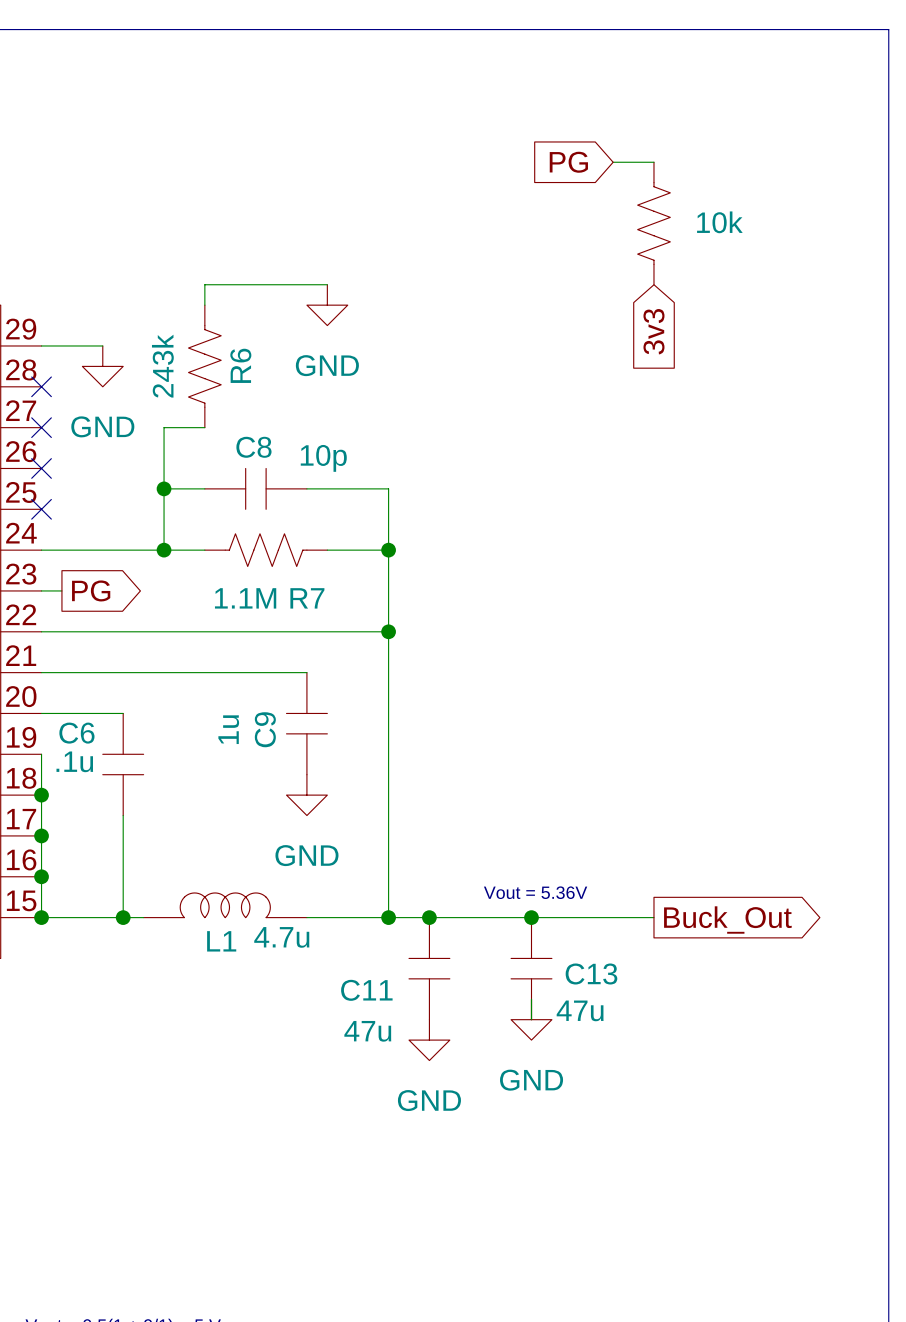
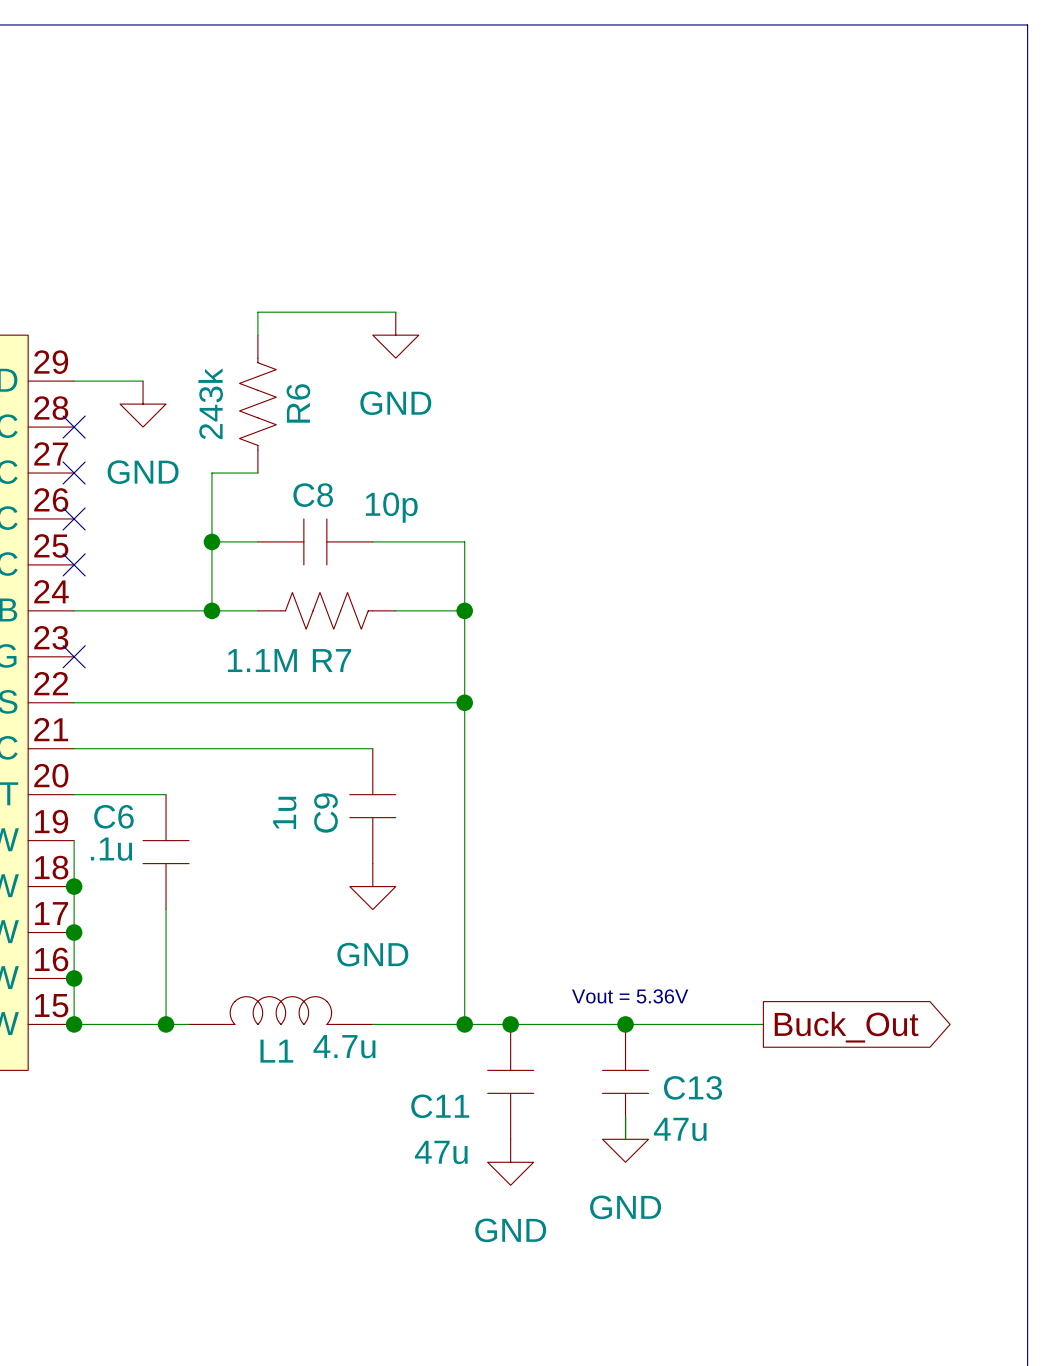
global label: PG (568, 162) -> none
wire: (613, 162) (653, 162) -> none
part: 10k (653, 223) -> none
global label: 3v3 (653, 331) -> none
wire: (41, 590) (61, 590) -> none
no-connect mark: none -> (74, 656)
global label: PG (91, 590) -> none
R7 value position: 1.1M (245, 598) -> 1.1M (262, 660)
R7 name position: R7 (307, 598) -> R7 (331, 660)

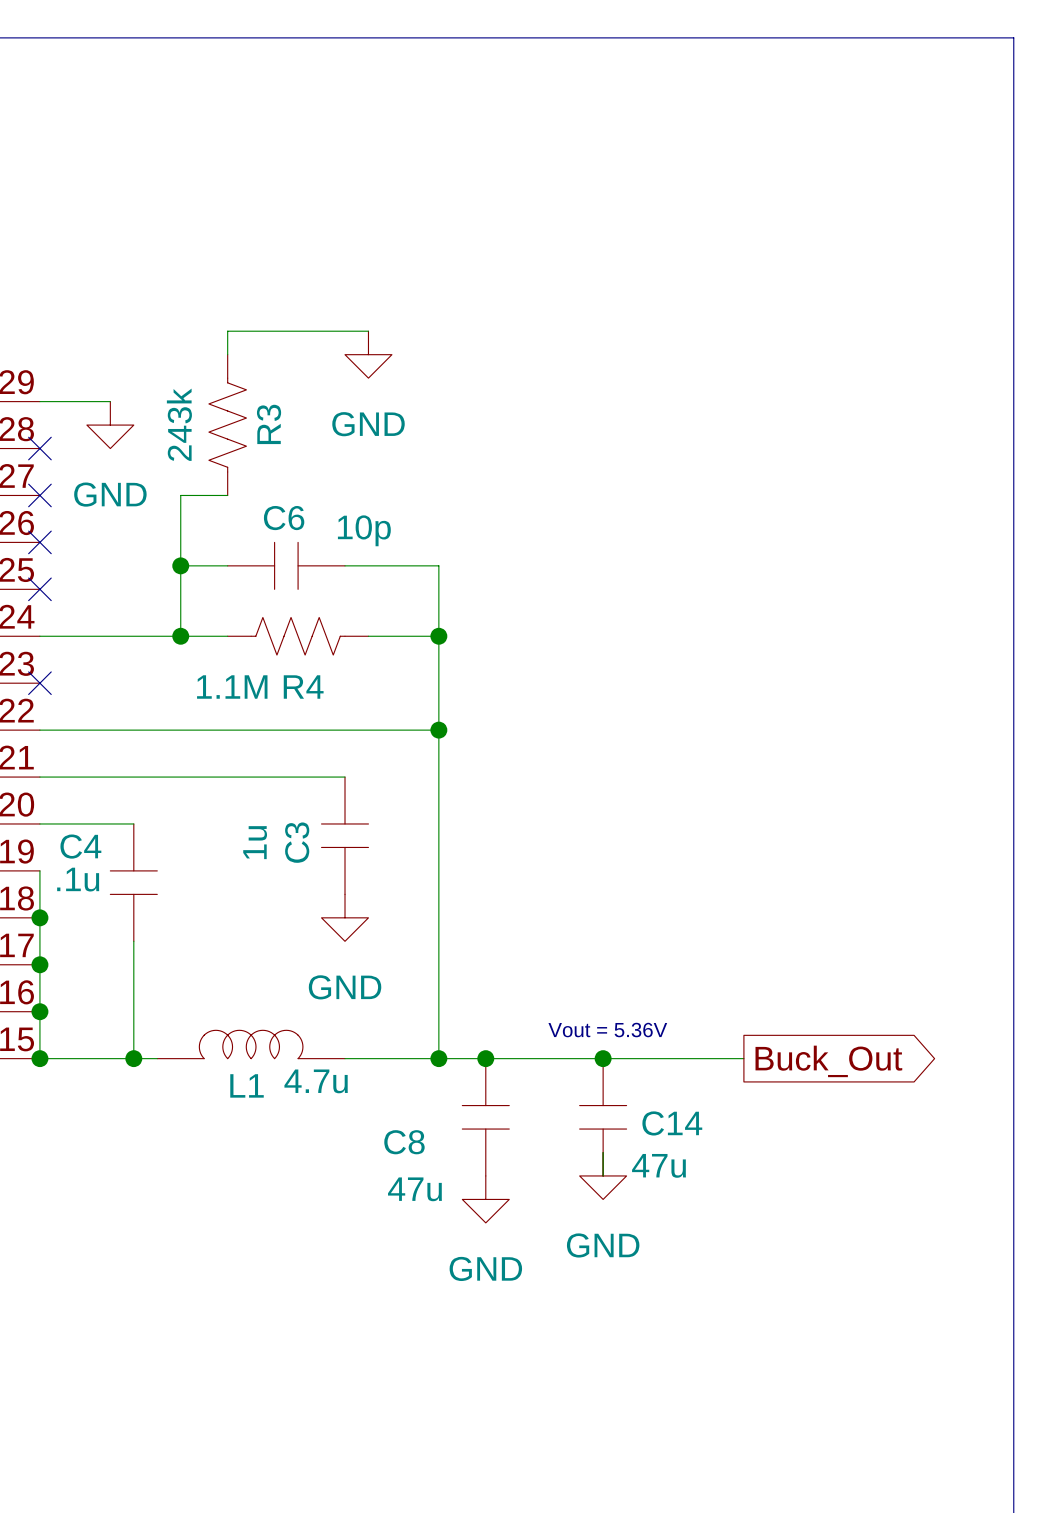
R6 name: R6 (298, 403) -> R3 (269, 424)
C8 name: C8 (313, 495) -> C6 (284, 518)
R7 name: R7 (331, 660) -> R4 (303, 687)
C9 name: C9 (325, 812) -> C3 (297, 842)
C6 name: C6 (113, 816) -> C4 (80, 846)
C13 name: C13 (693, 1087) -> C14 (672, 1123)
C11 name: C11 (440, 1106) -> C8 (404, 1142)

